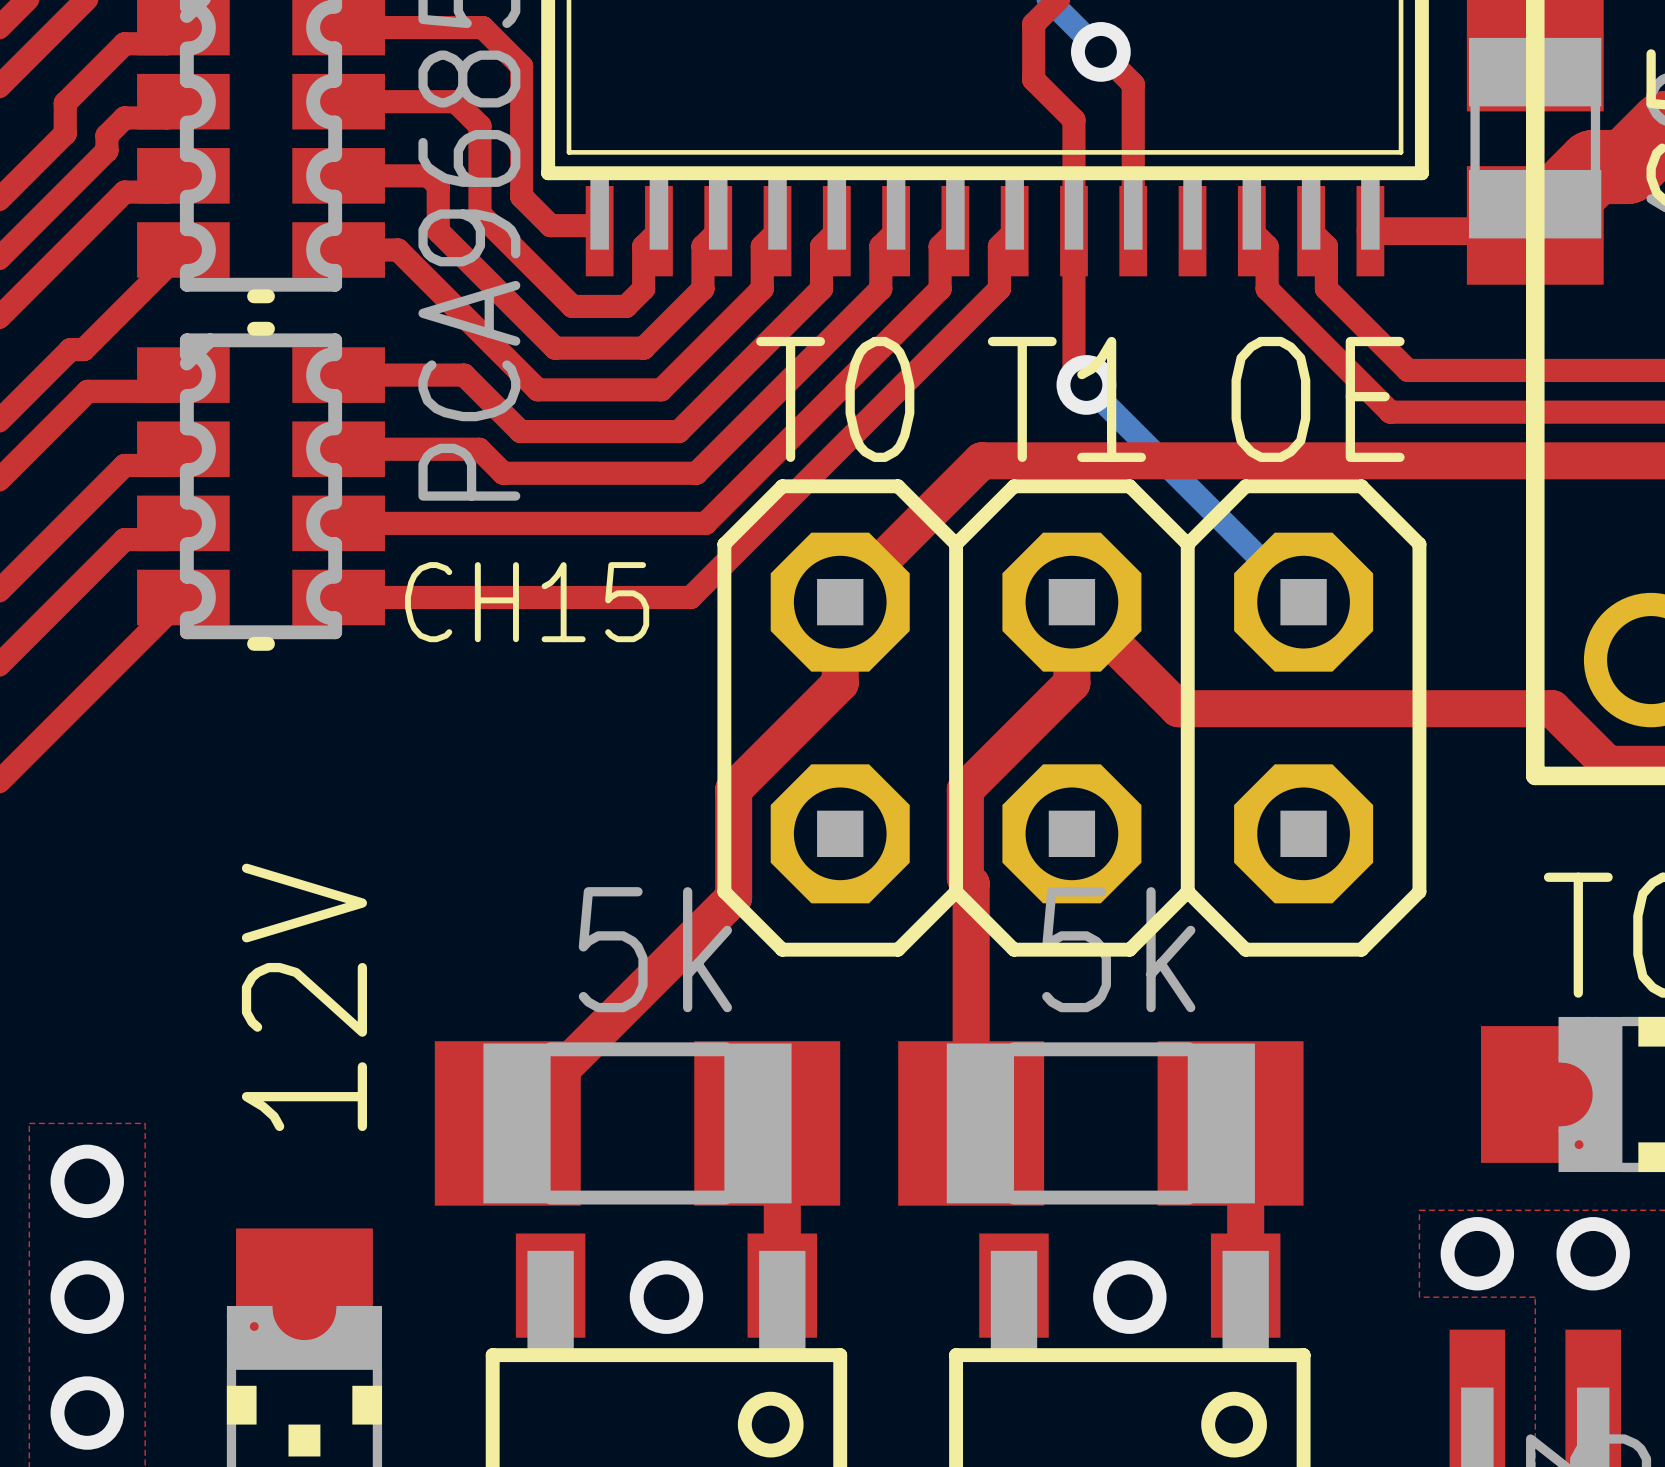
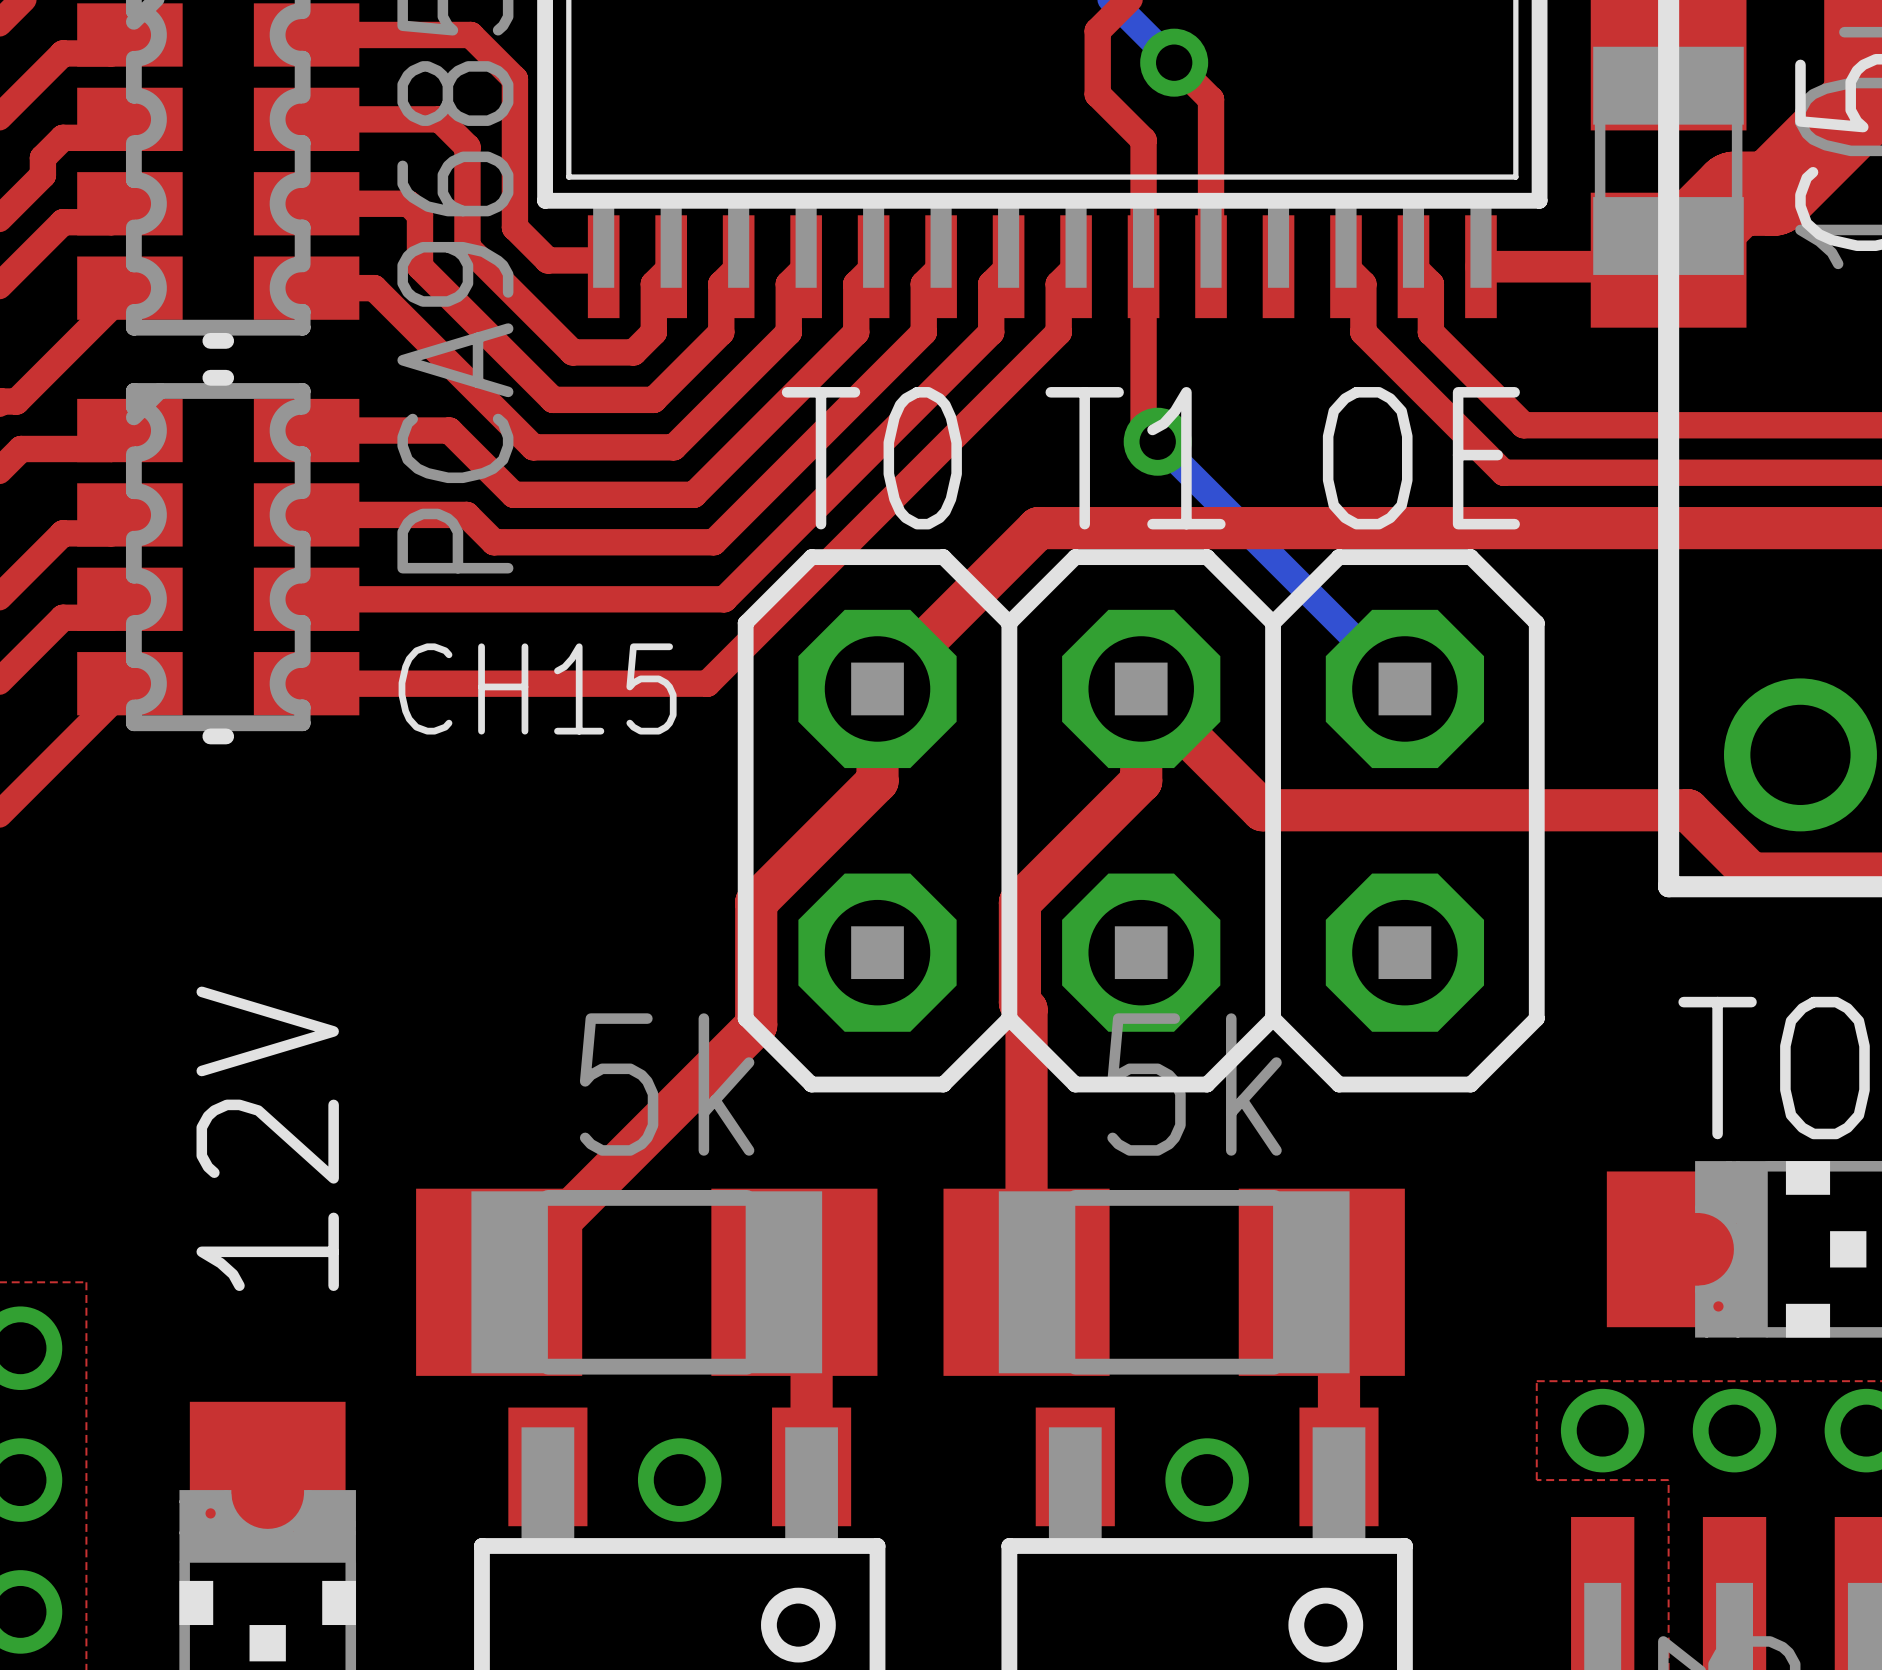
text position: CH15 (527, 602) -> CH15 (537, 688)

